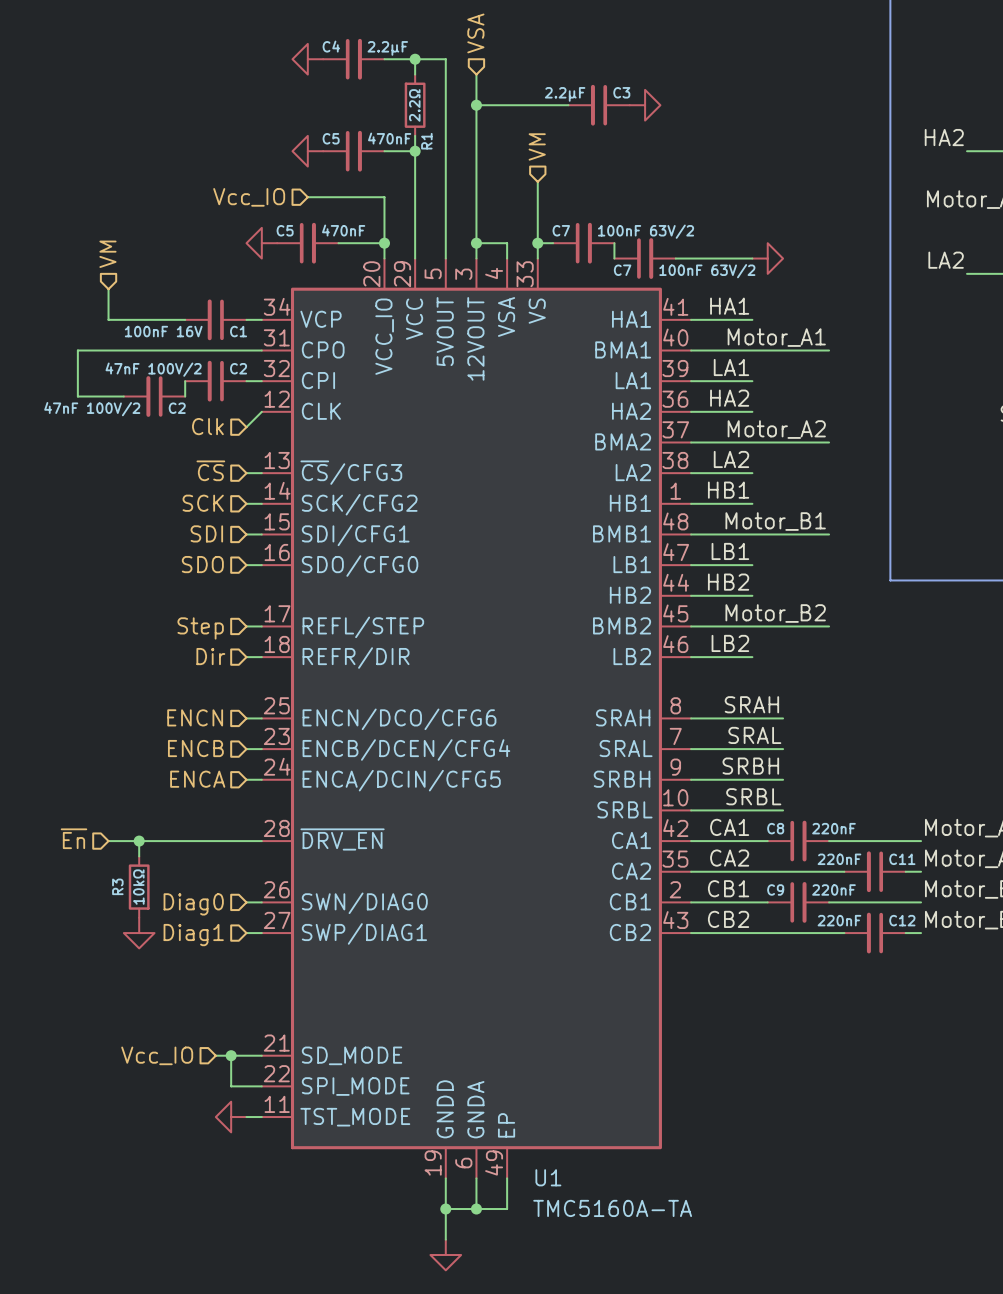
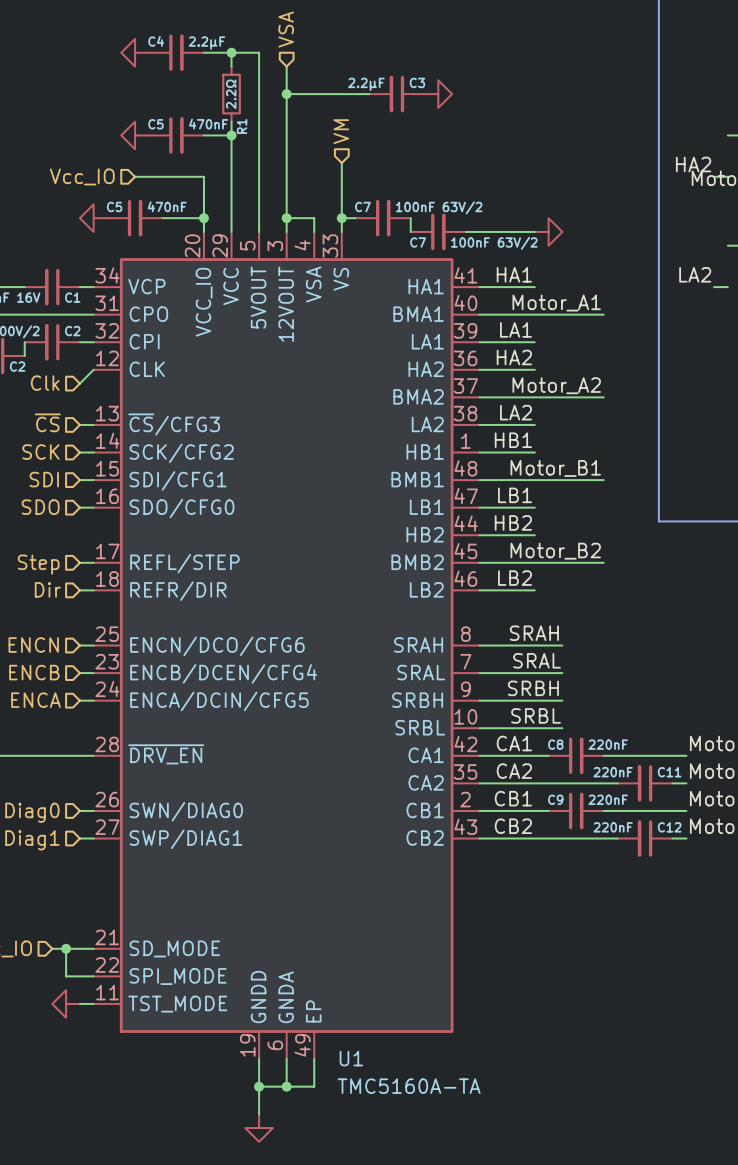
label position: HA2 (944, 137) -> HA2 (693, 164)
wire: none -> (714, 176) (727, 176)
label position: LA2 (946, 260) -> LA2 (695, 274)
wire: none -> (714, 287) (727, 287)

